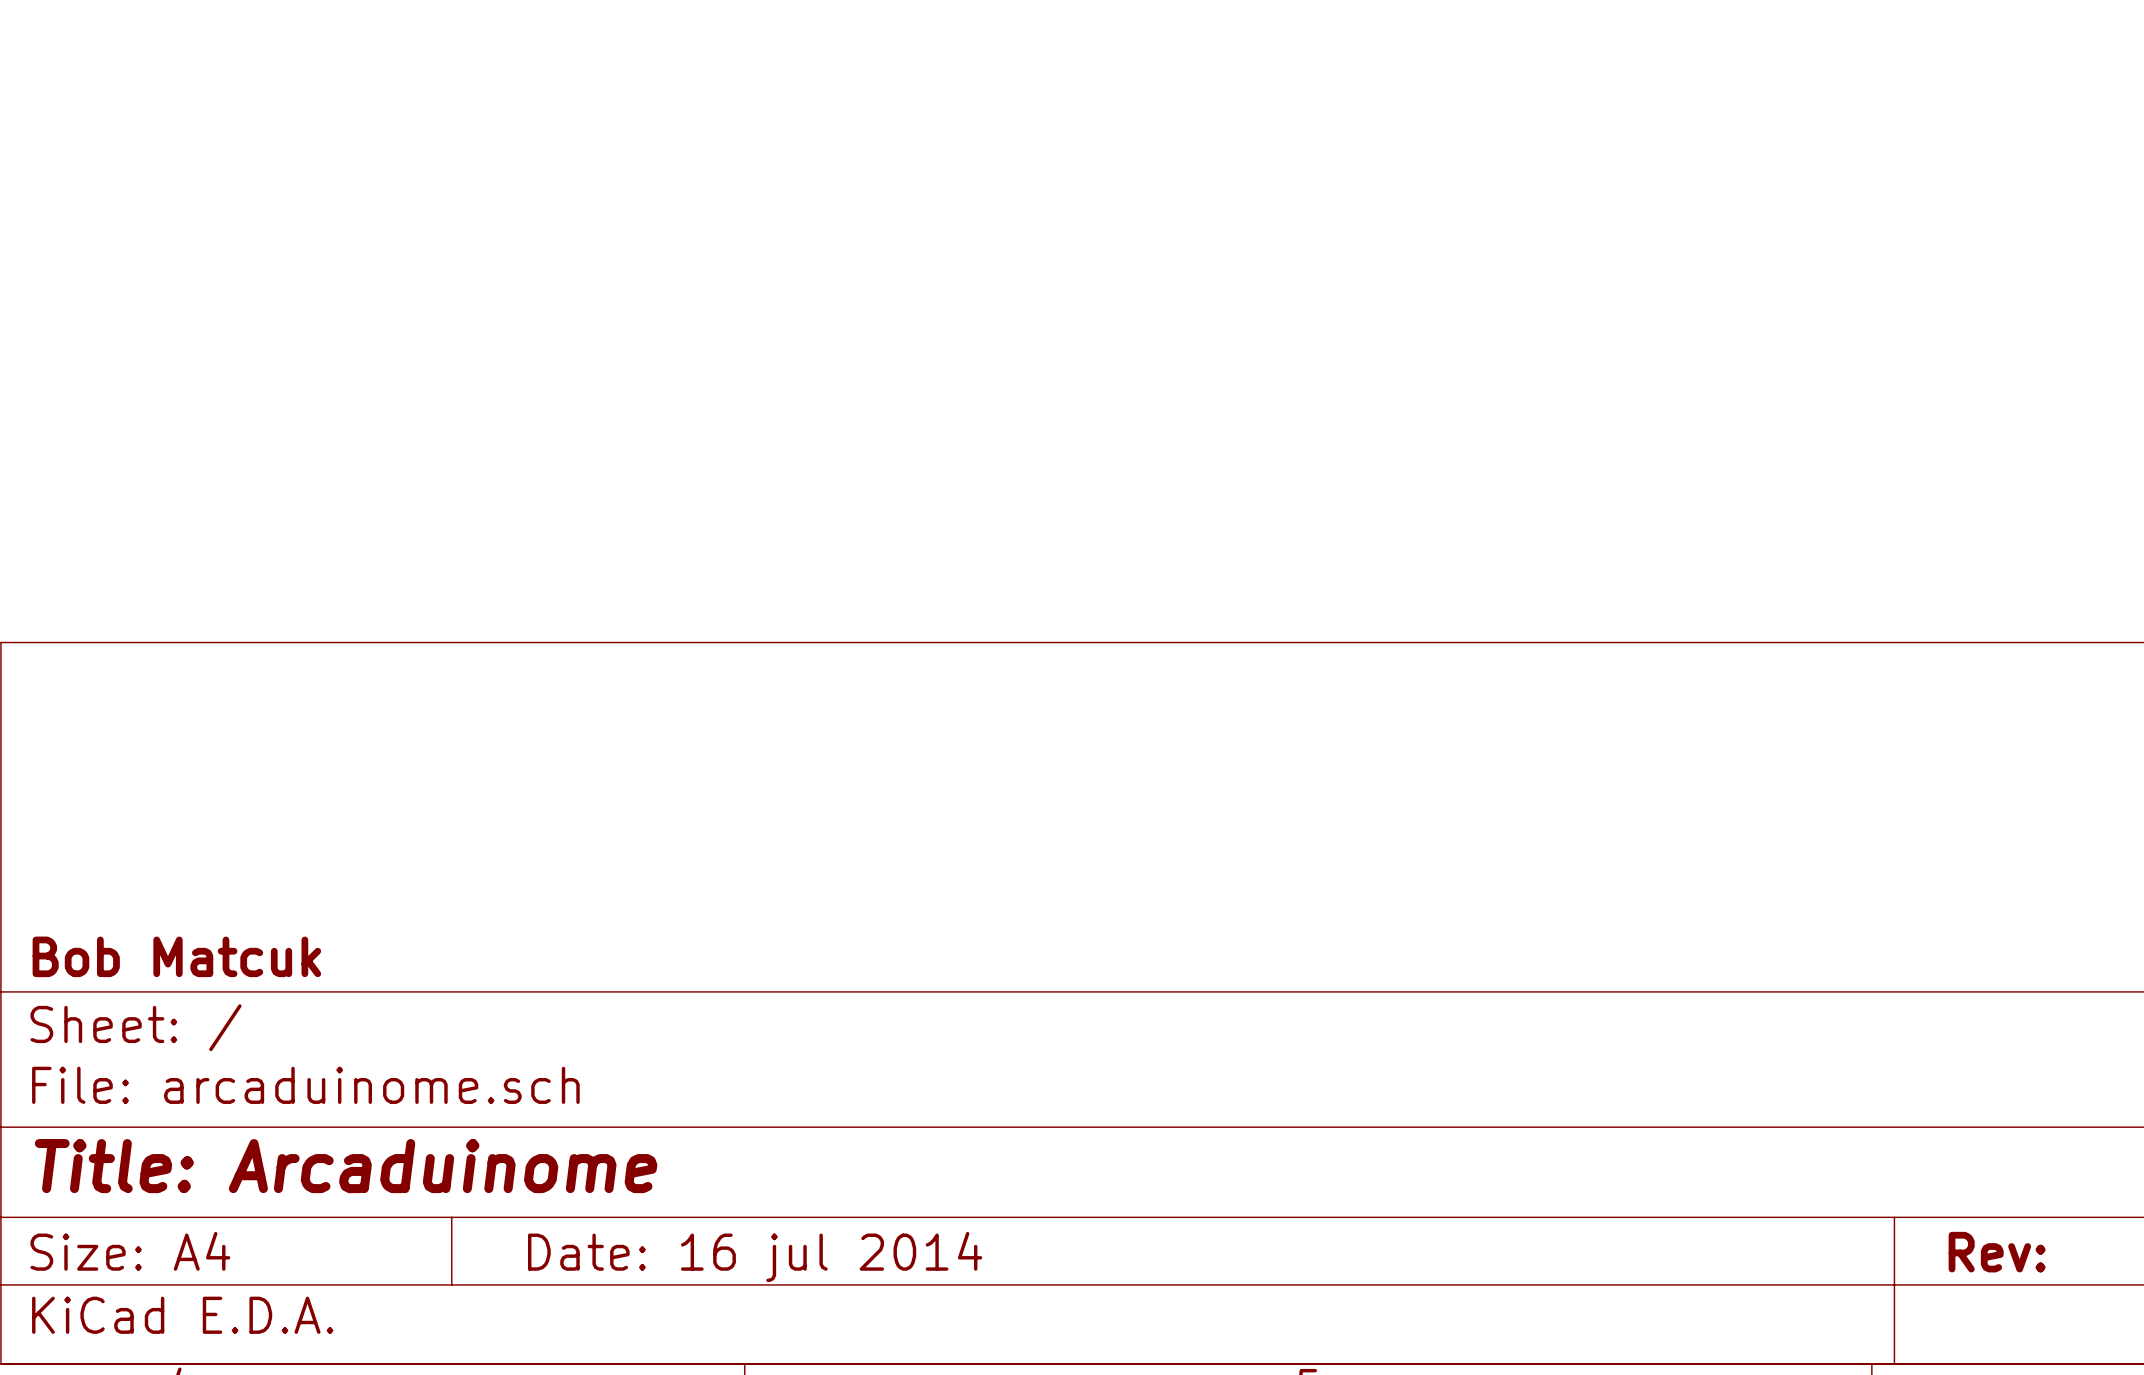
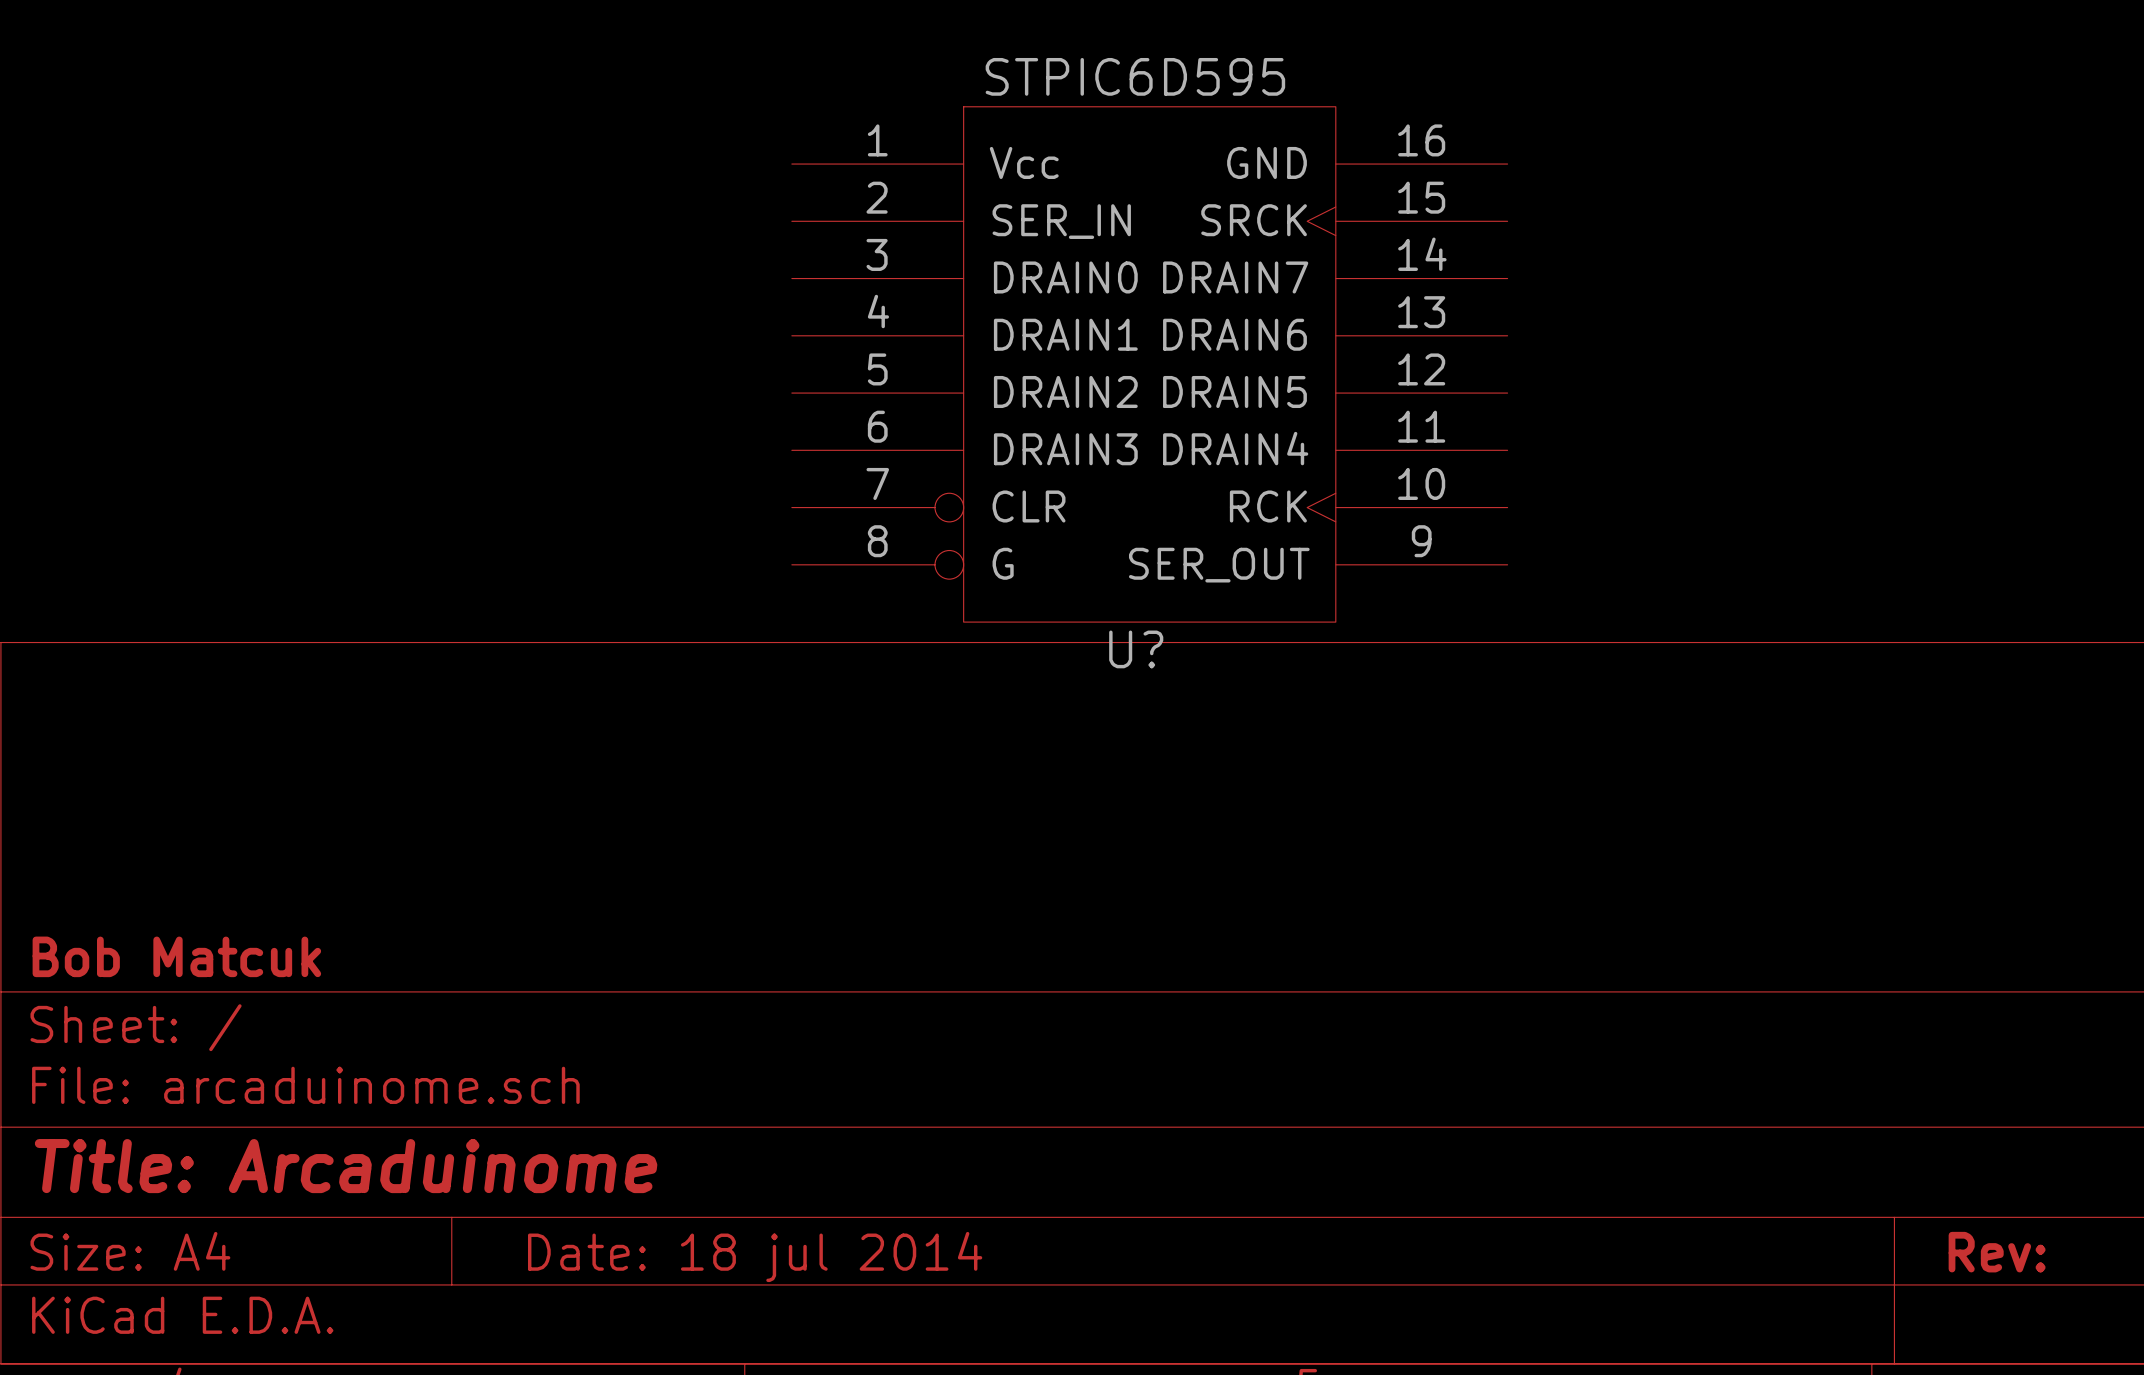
U?: none -> STPIC6D595 (1149, 364)
title block: Date: 16 jul 2014 (755, 1256) -> Date: 18 jul 2014 (755, 1256)

